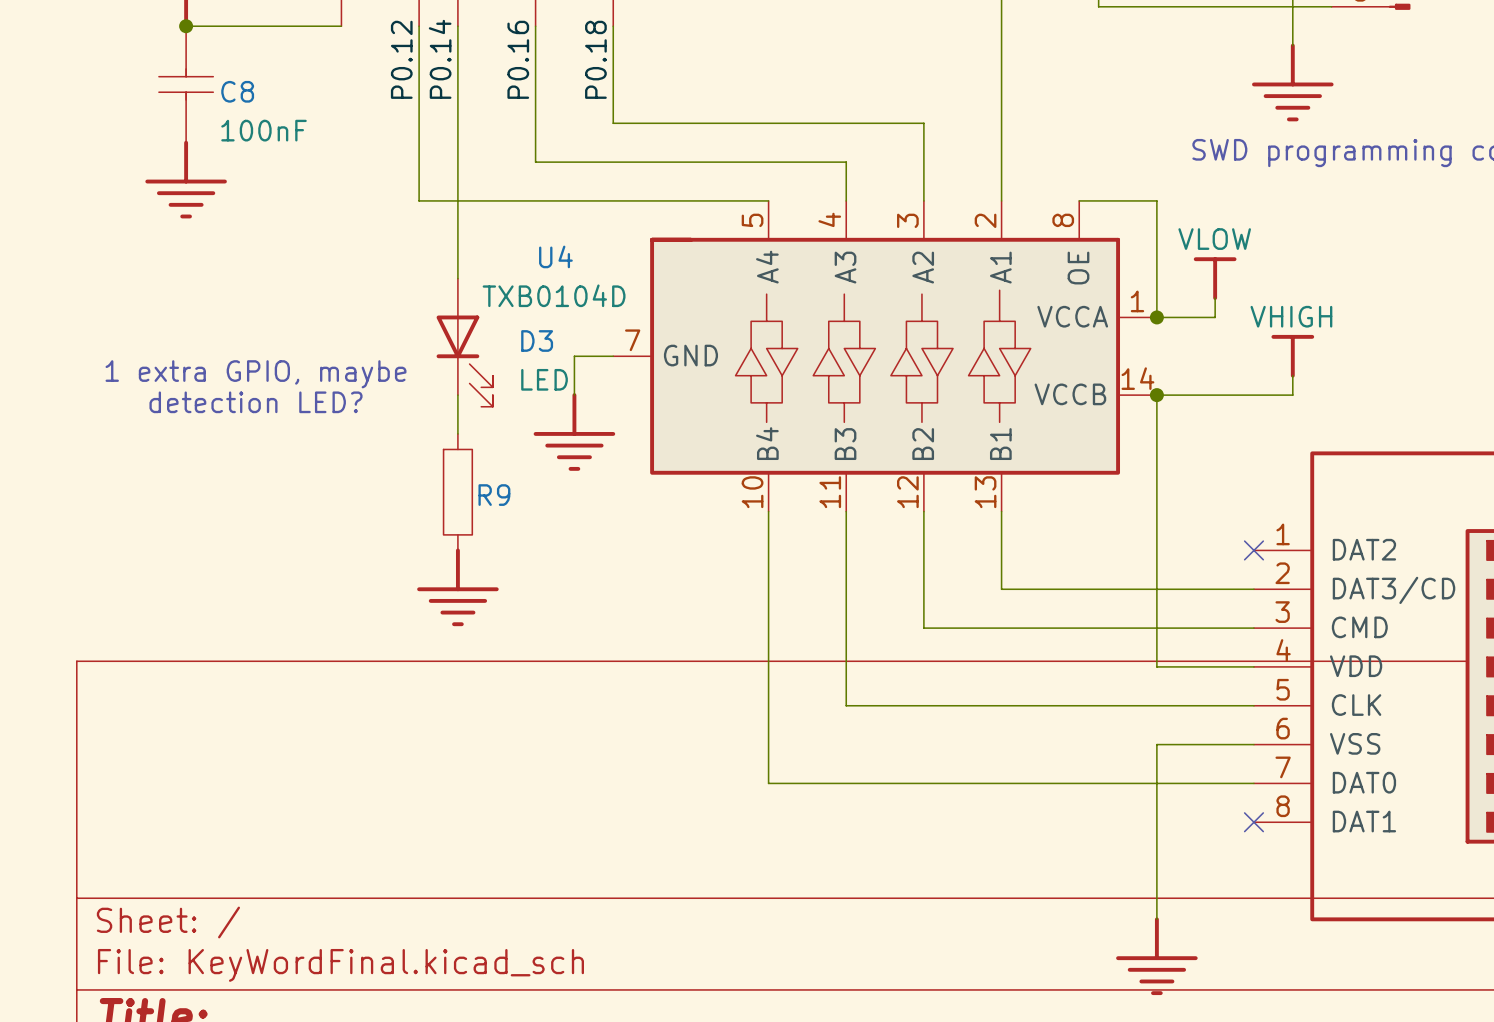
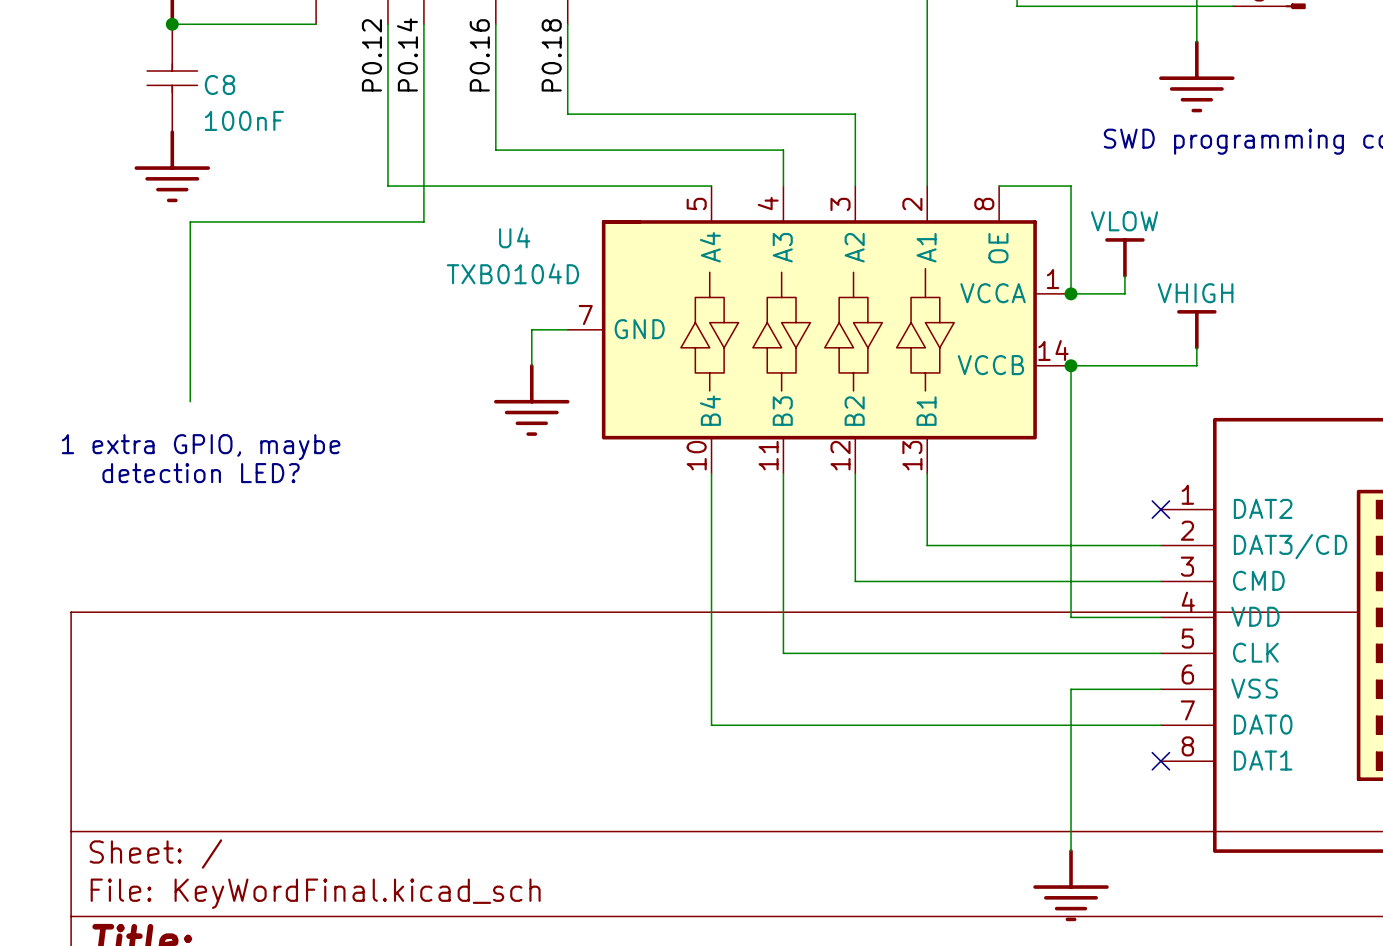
wire: (457, 239) (457, 278) -> (423, 221) (190, 221) (190, 401)
D3: LED (464, 342) -> none
text position: 1 extra GPIO, maybe (256, 374) -> 1 extra GPIO, maybe (201, 447)
wire: (457, 395) (457, 433) -> none
text position: detection LED? (256, 402) -> detection LED? (201, 473)
R9: (457, 492) -> none
power symbol: (457, 587) -> none

